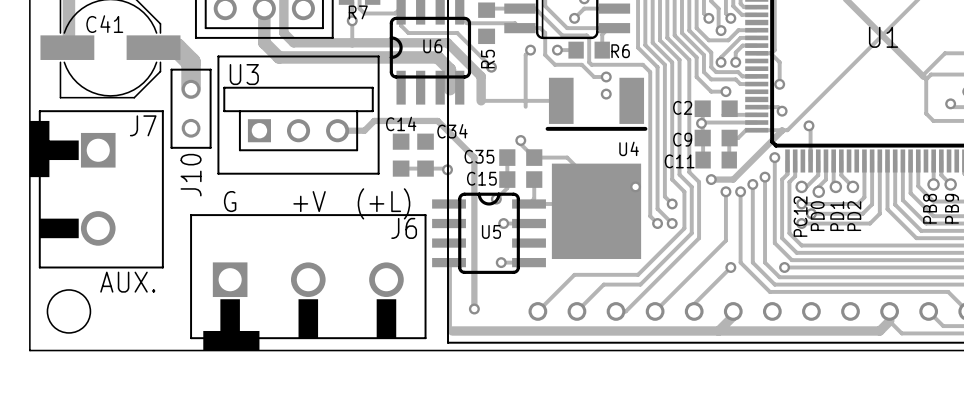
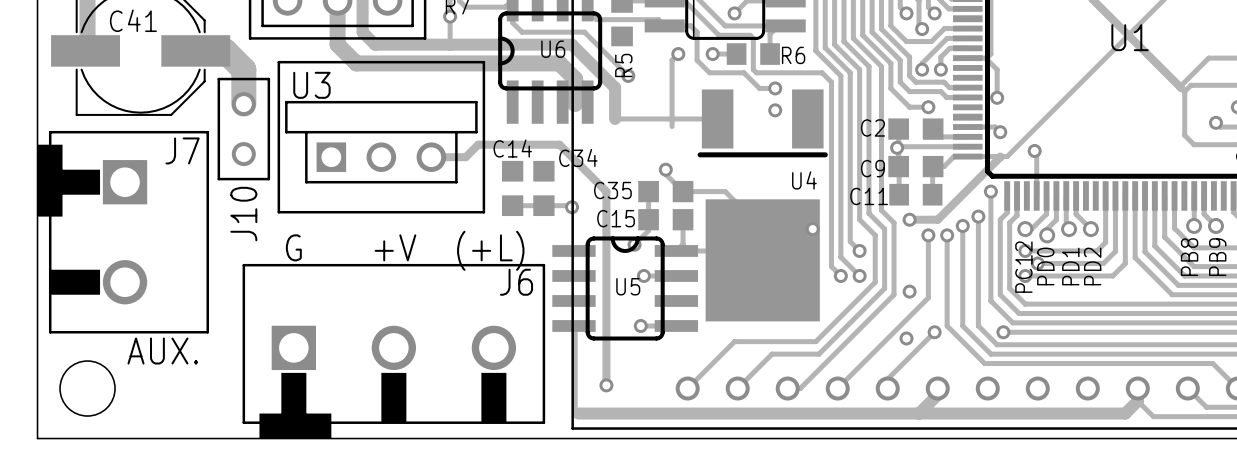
via: none -> (909, 291)
via: none -> (906, 338)

